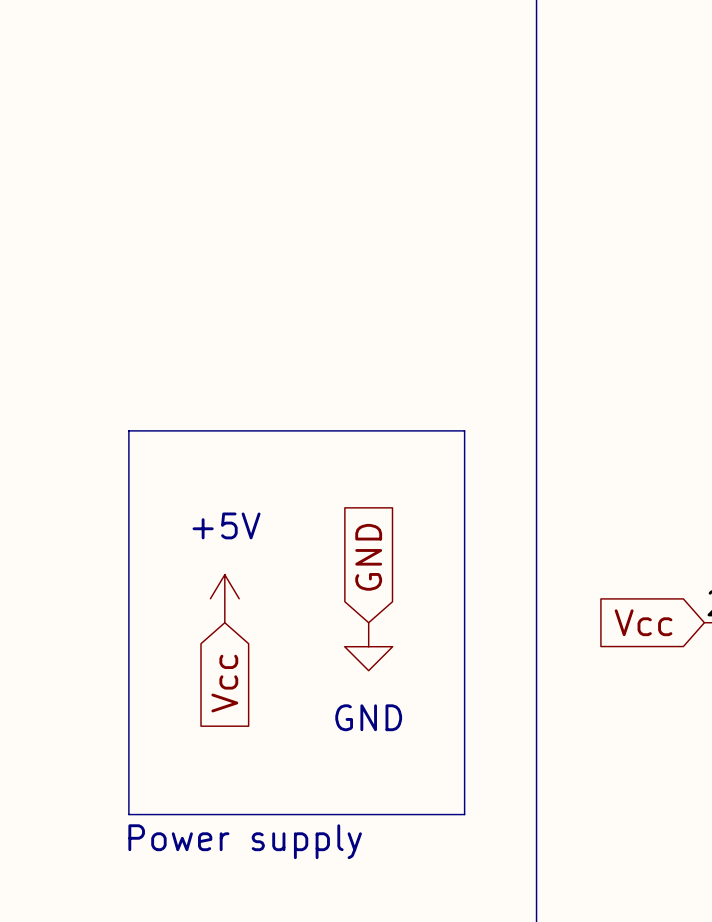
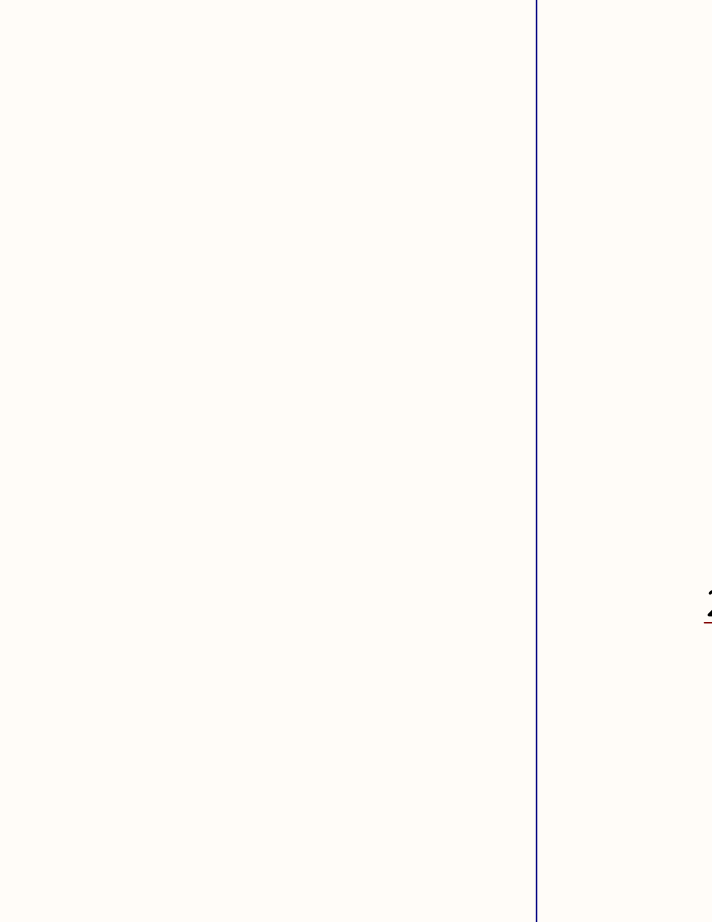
line: (128, 430) (464, 430) (464, 814) (128, 814) (128, 430) -> none
global label: GND (368, 557) -> none
power symbol: +5V (224, 598) -> none
global label: Vcc (643, 622) -> none
power symbol: GND (368, 646) -> none
global label: Vcc (224, 683) -> none
text: Power supply (245, 841) -> none

